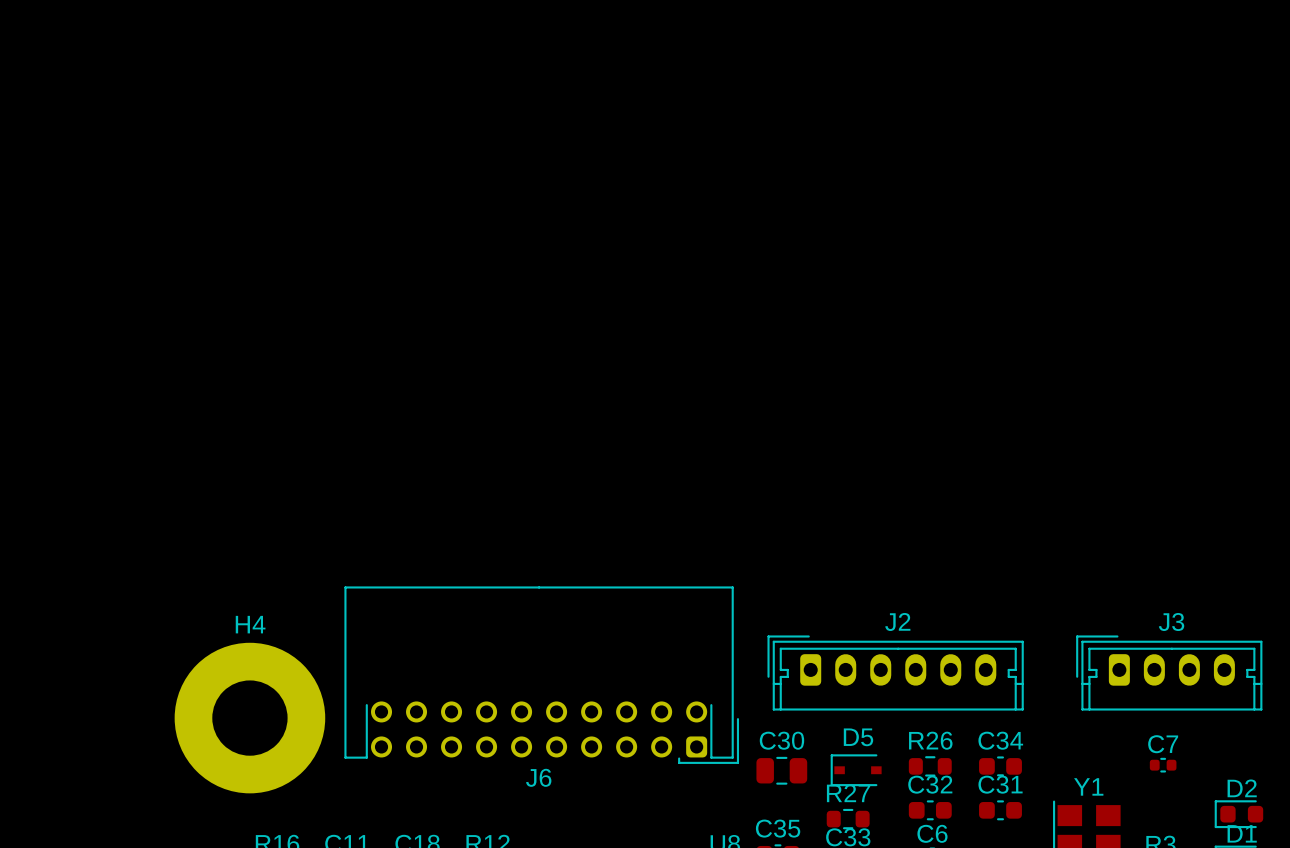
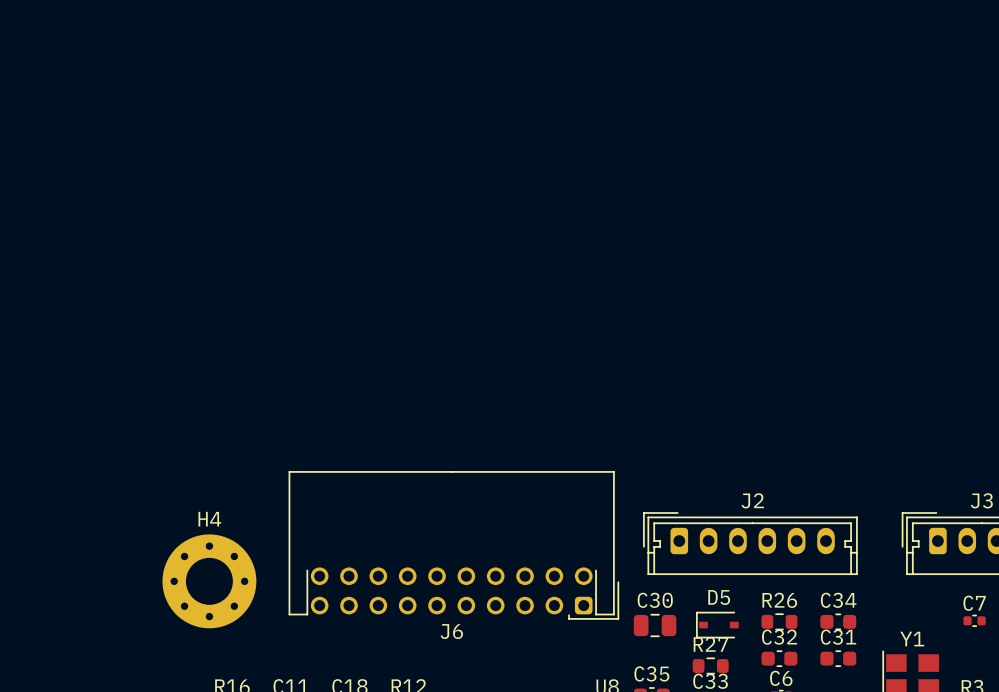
H4 footprint: [174, 642, 326, 794] -> [162, 534, 257, 629]

